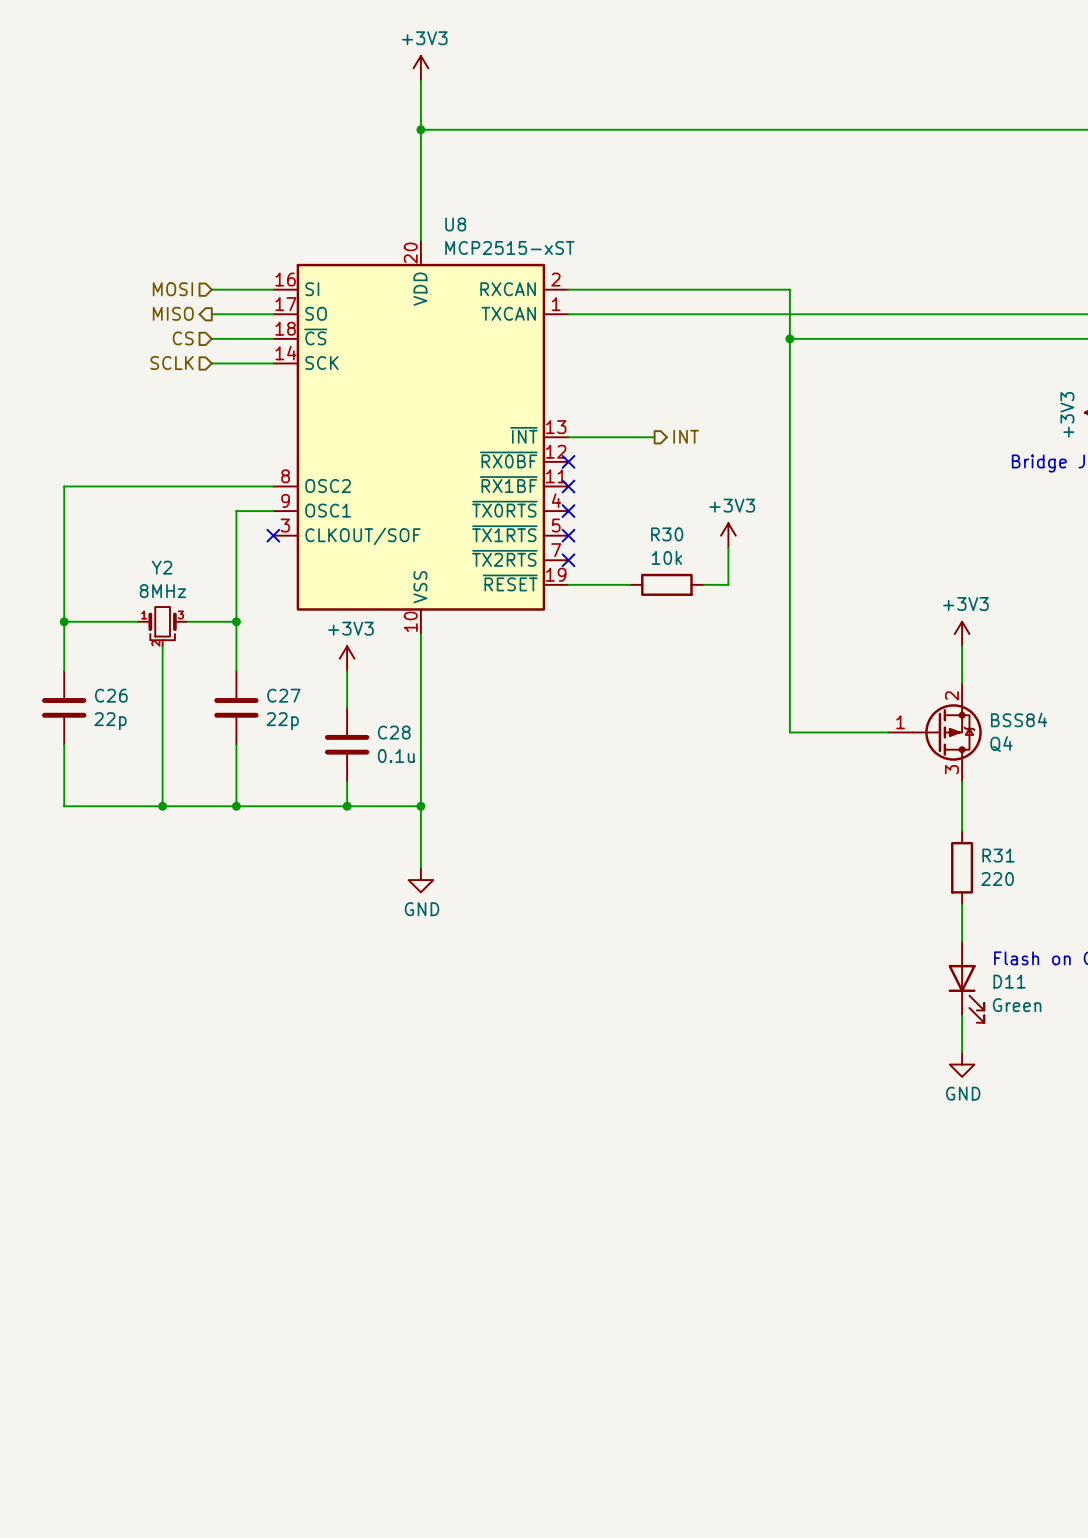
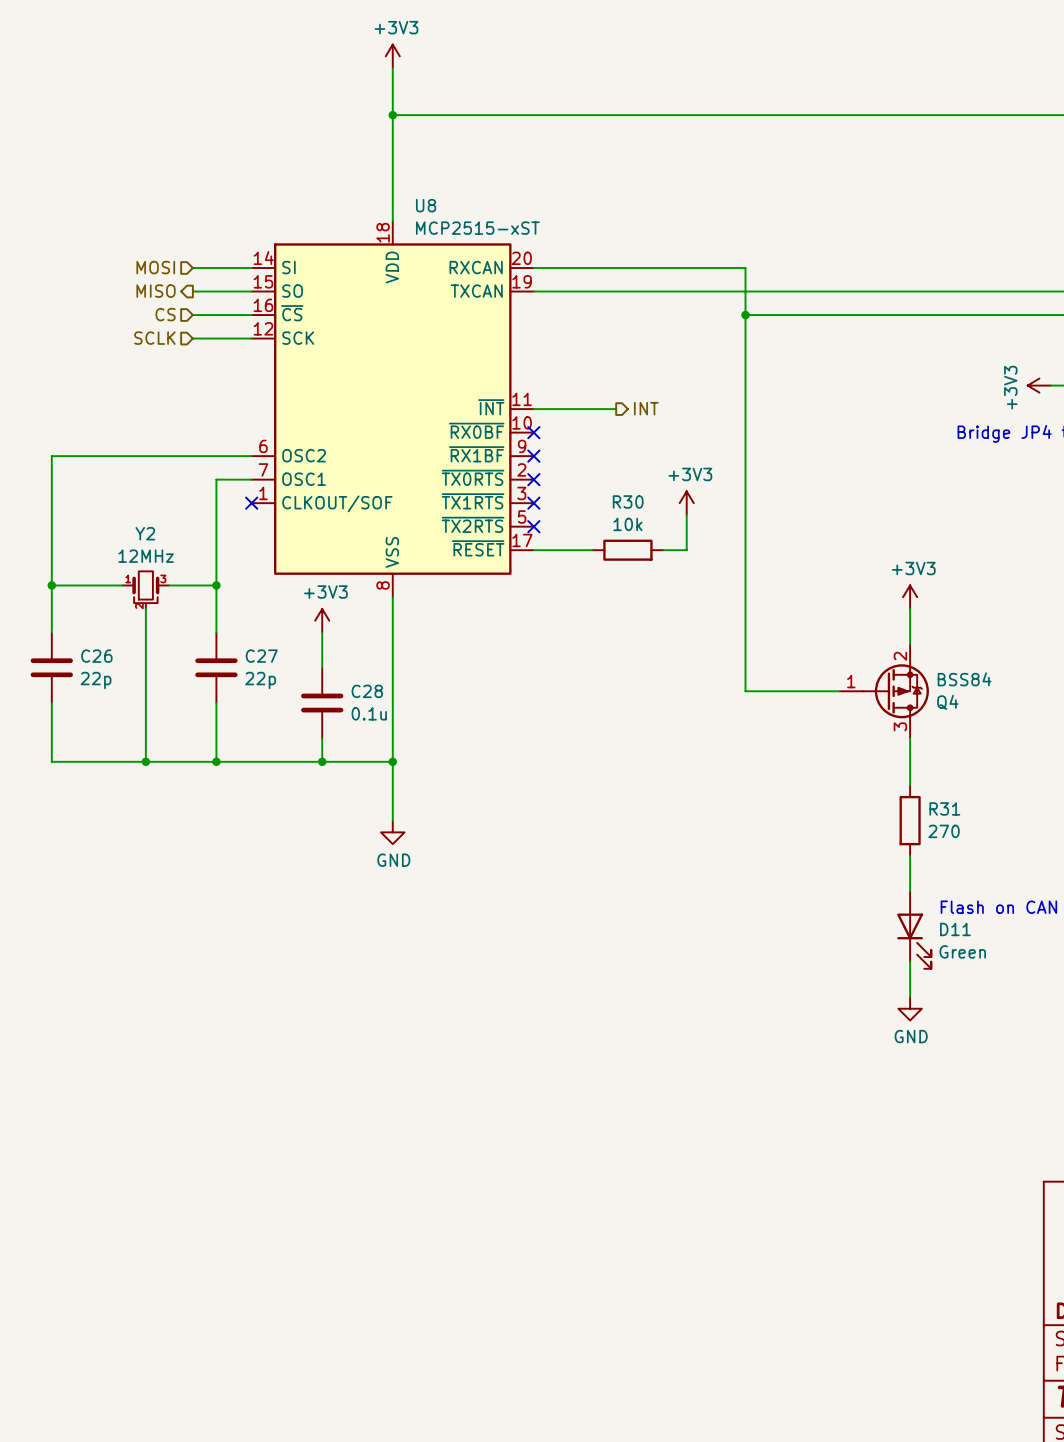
U8 symbol: [273, 240, 569, 635] -> [251, 220, 534, 598]
Y2 value: 8MHz (162, 591) -> 12MHz (146, 556)
R31 value: 220 (997, 879) -> 270 (944, 831)

